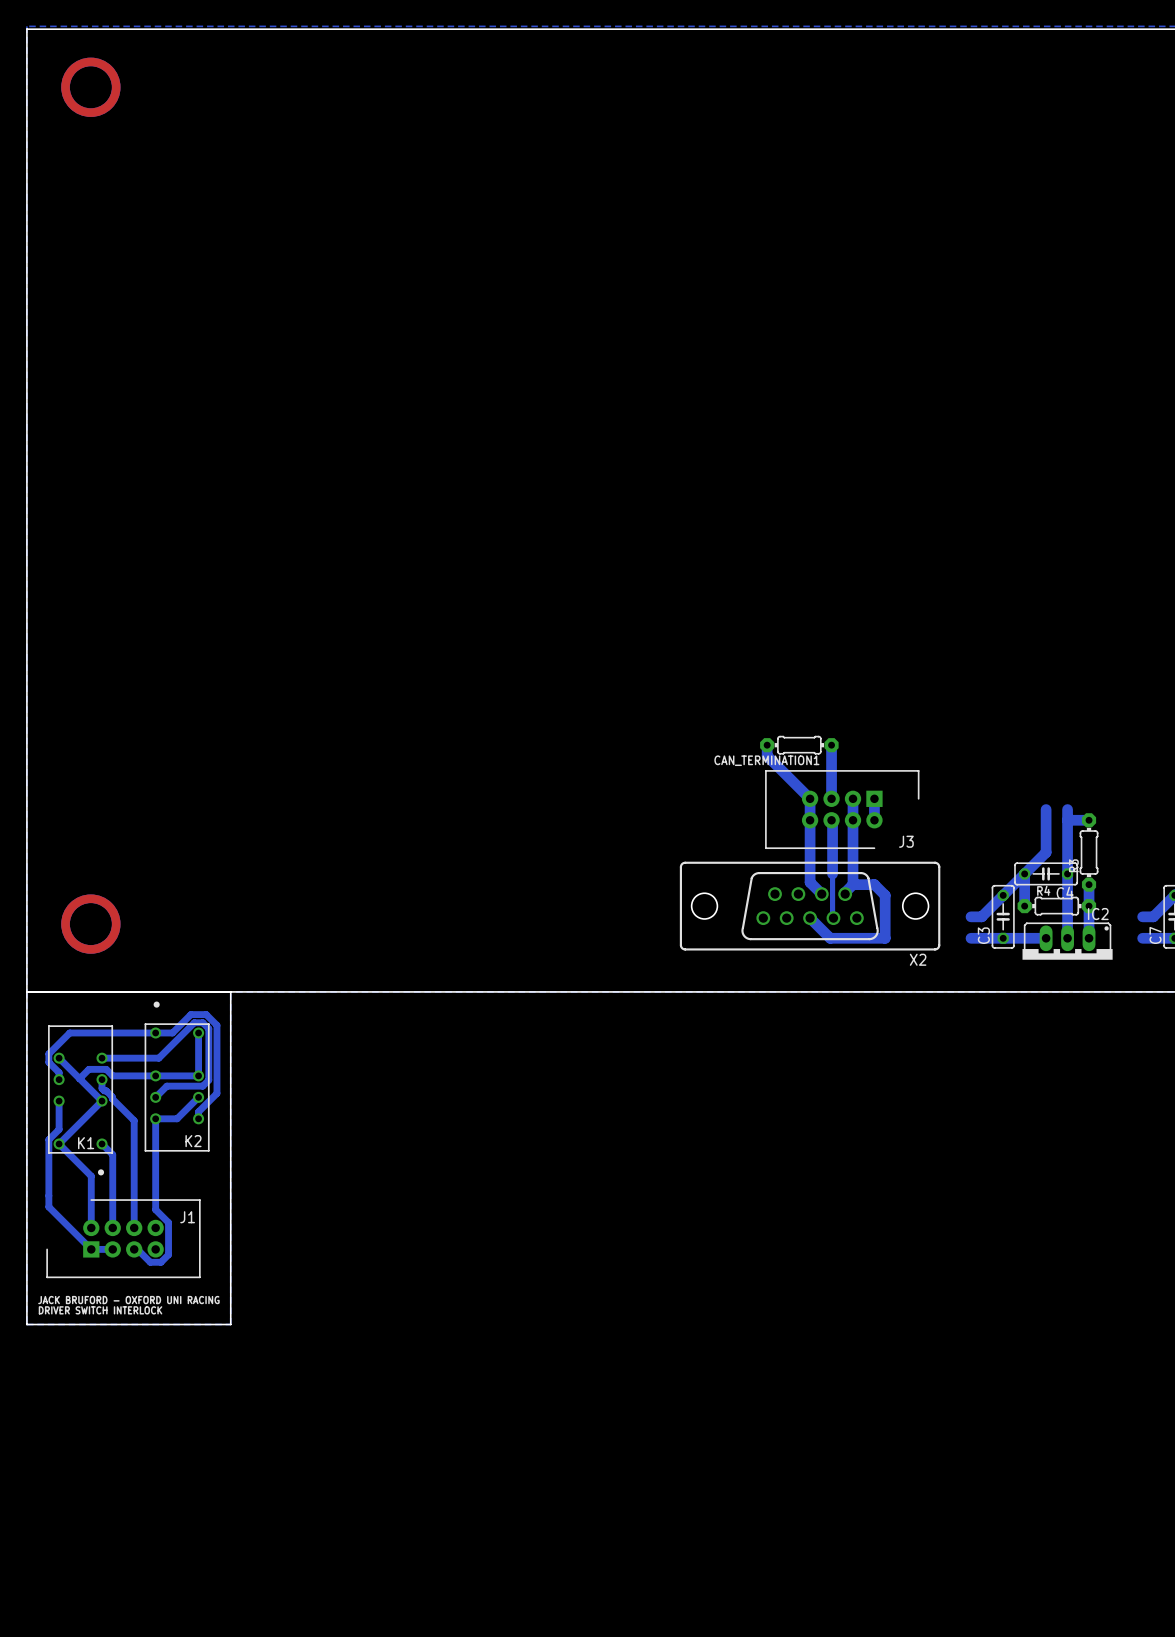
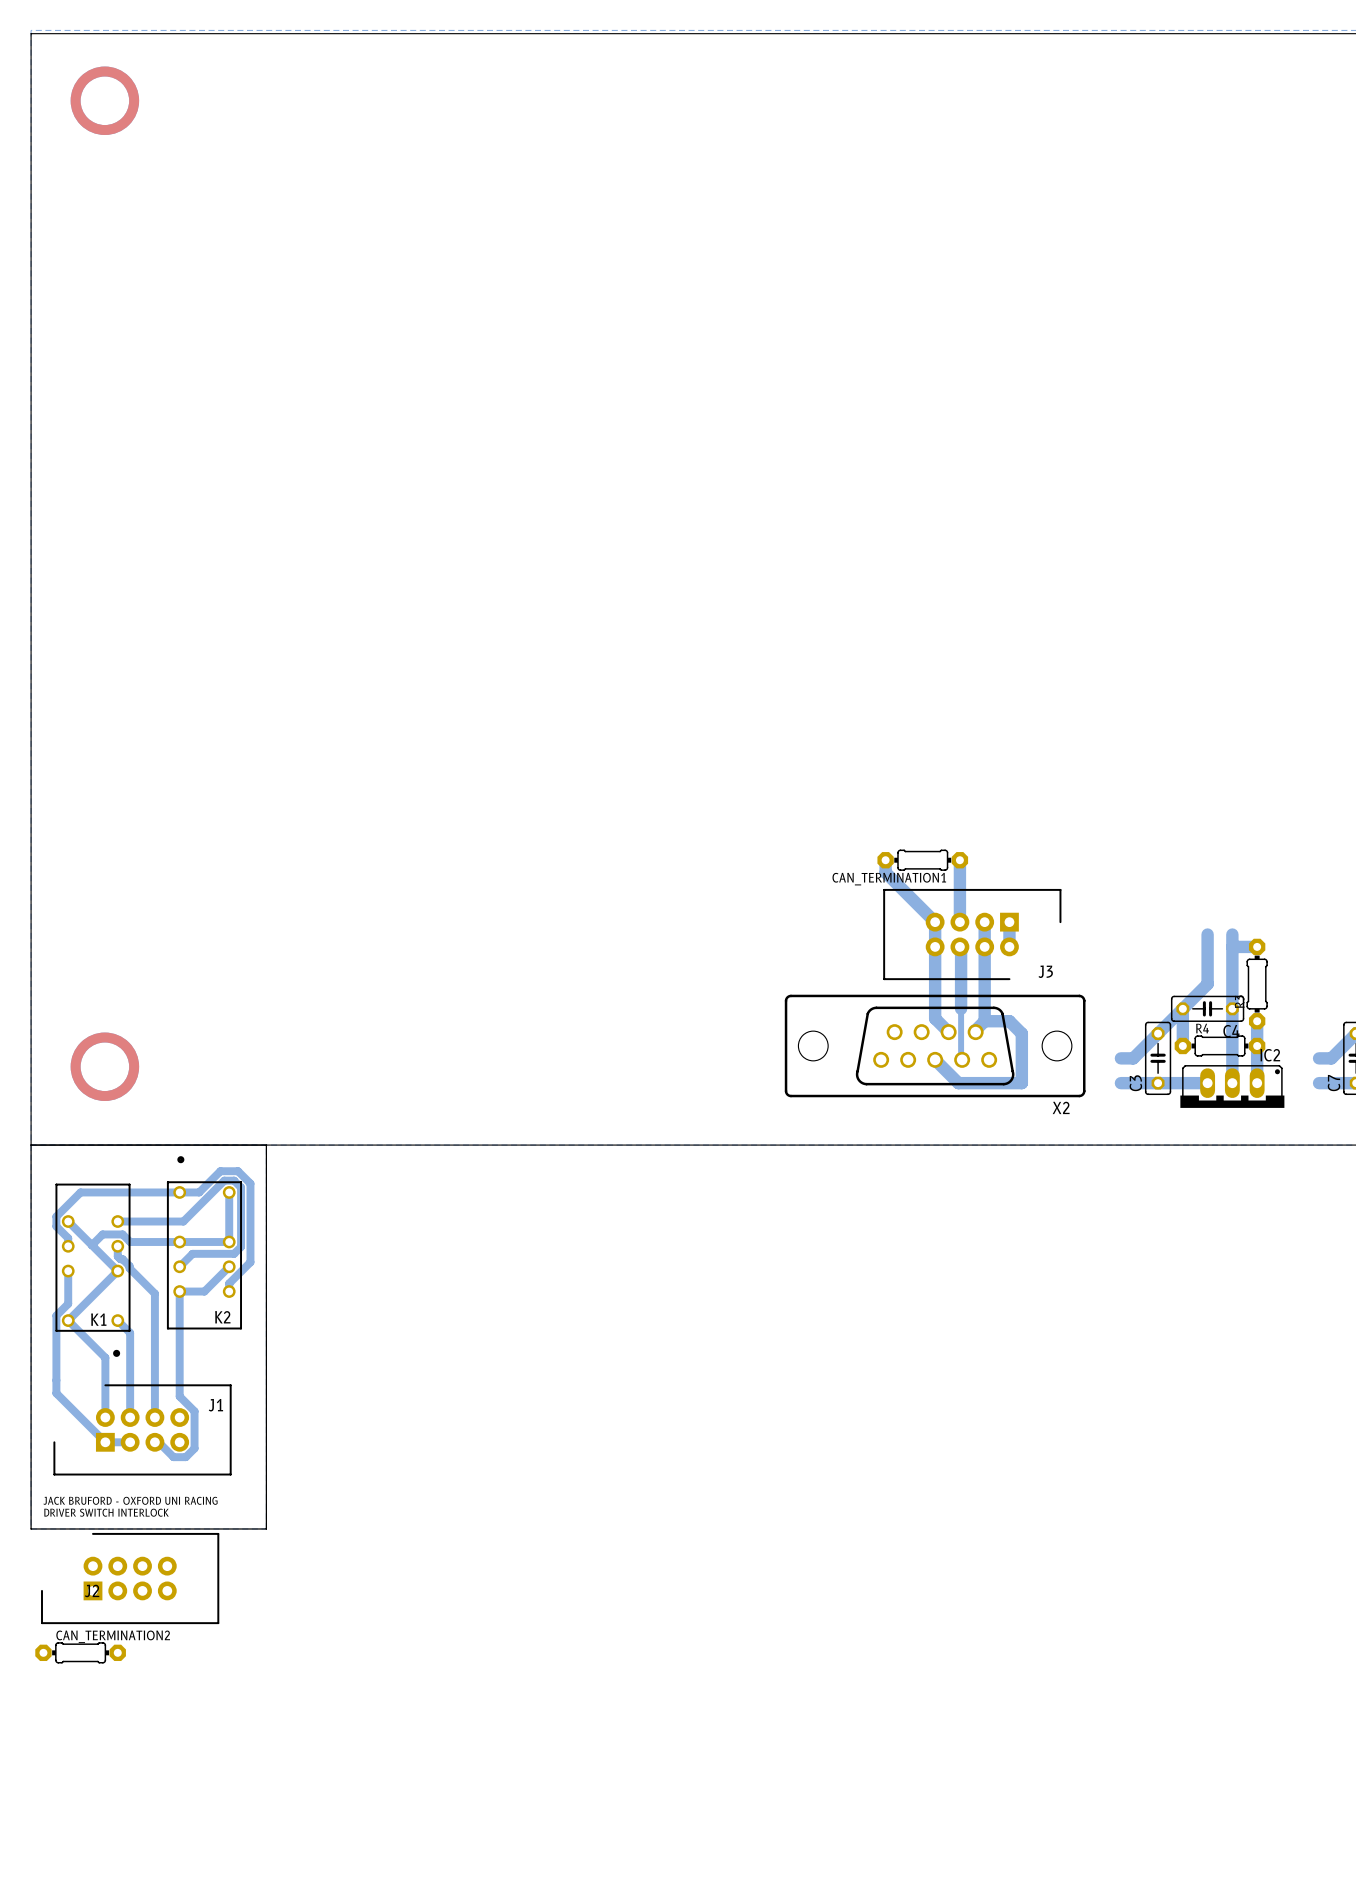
J2: none -> (130, 1578)
CAN_TERMINATION2: none -> (80, 1652)

